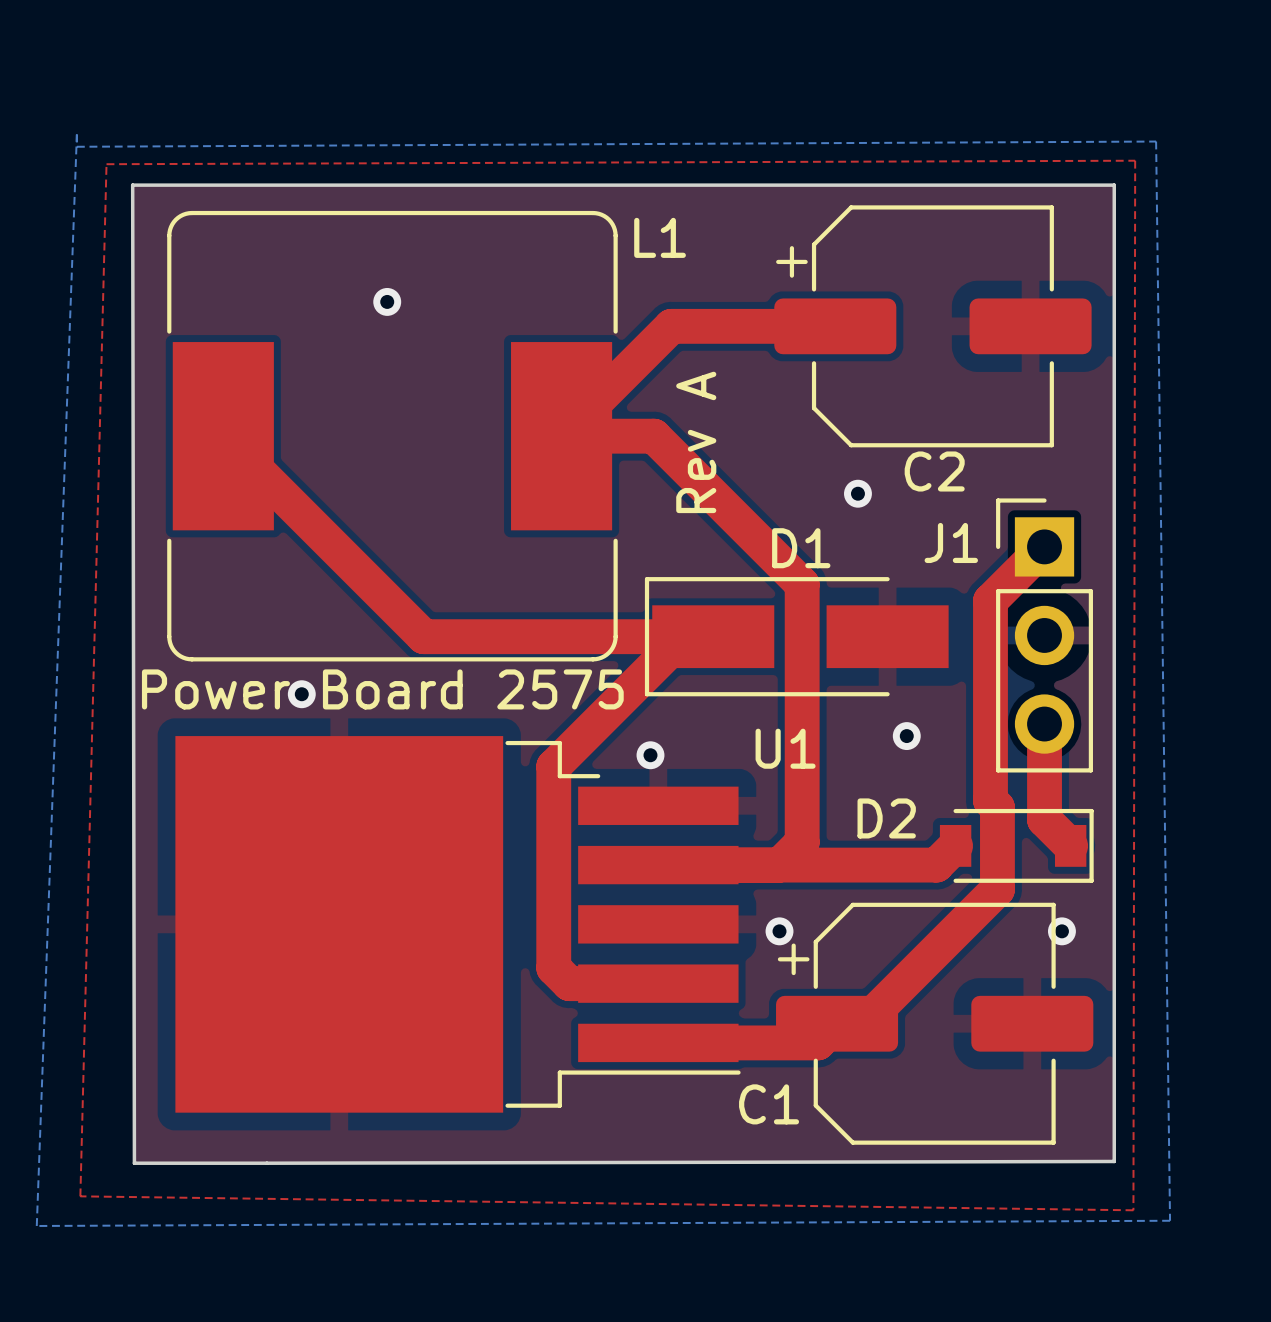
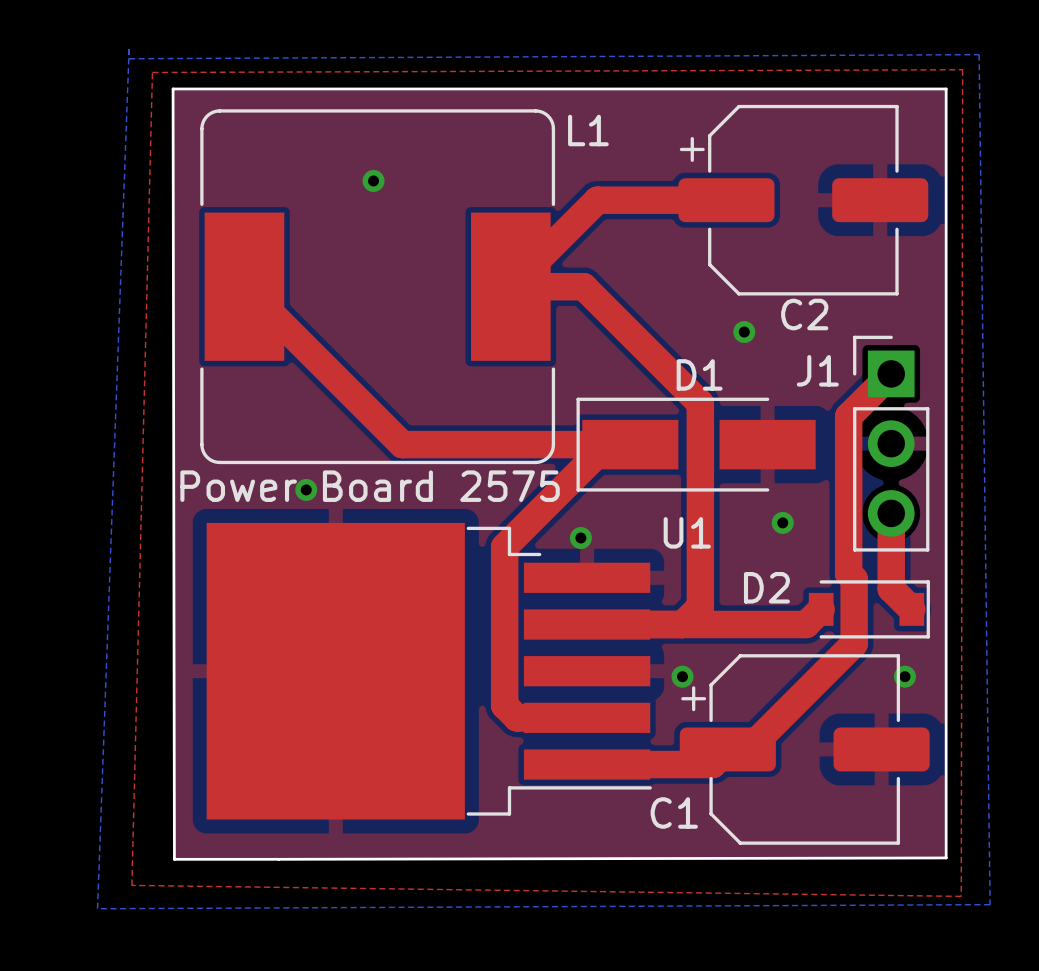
text: Rev A (696, 442) -> none

